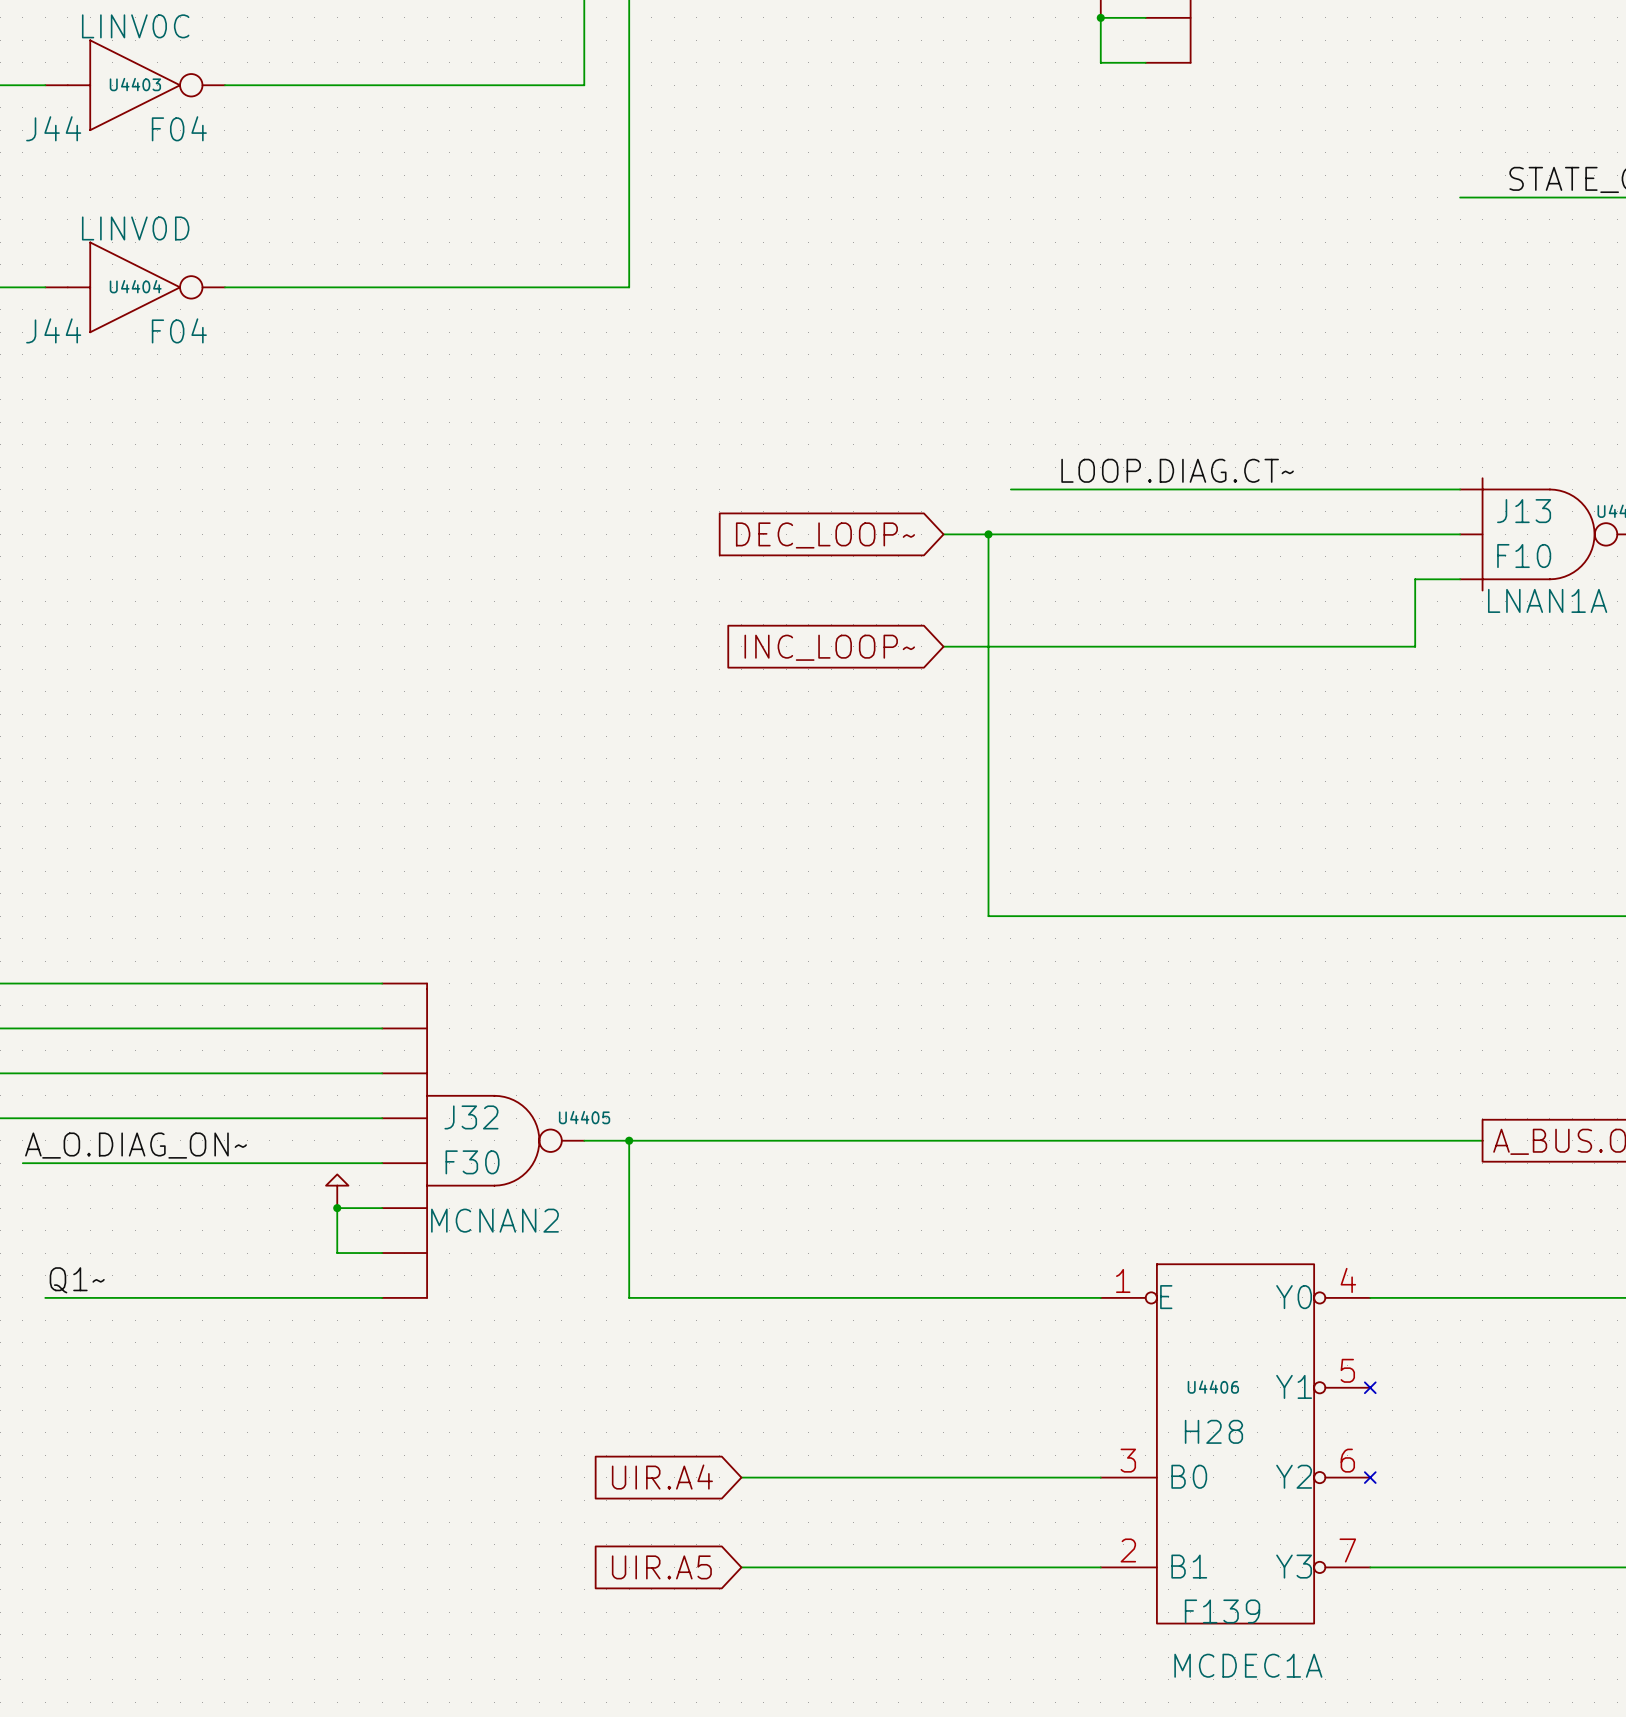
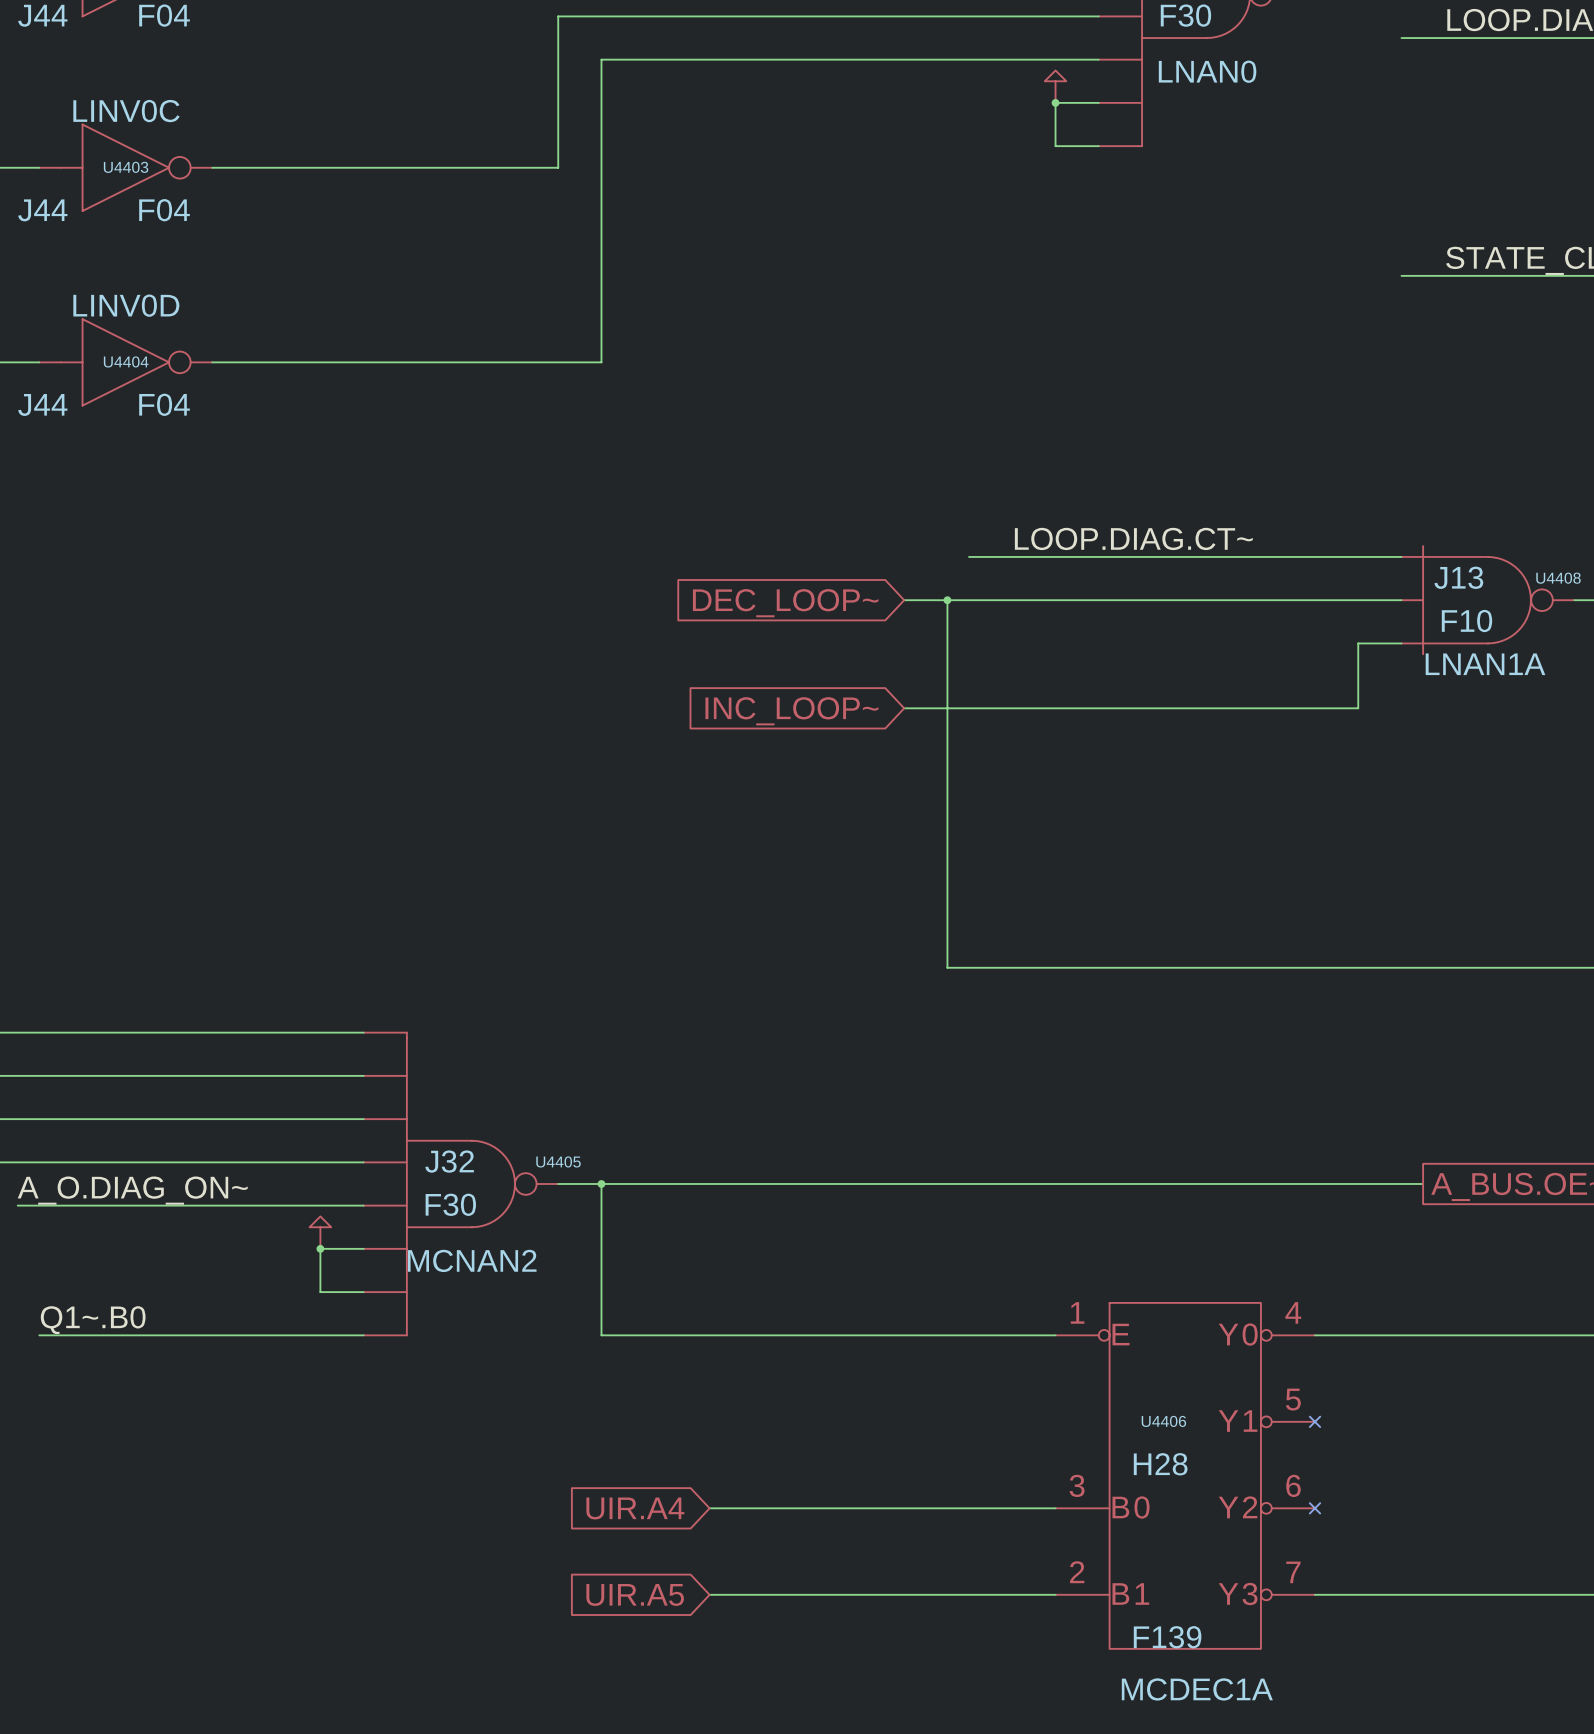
U4406 symbol: [1100, 1264, 1371, 1624] -> [1055, 1302, 1316, 1649]
label: Q1~ (77, 1280) -> Q1~.B0 (93, 1320)

